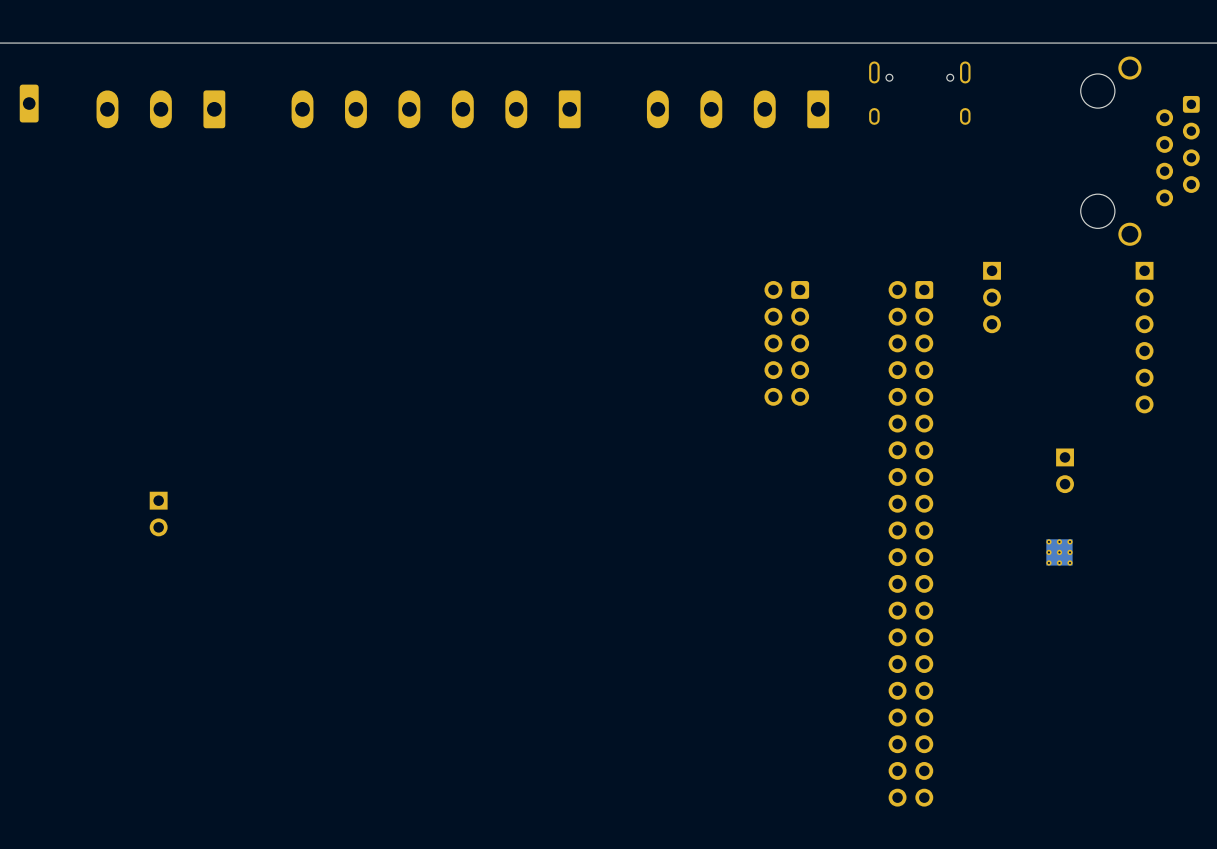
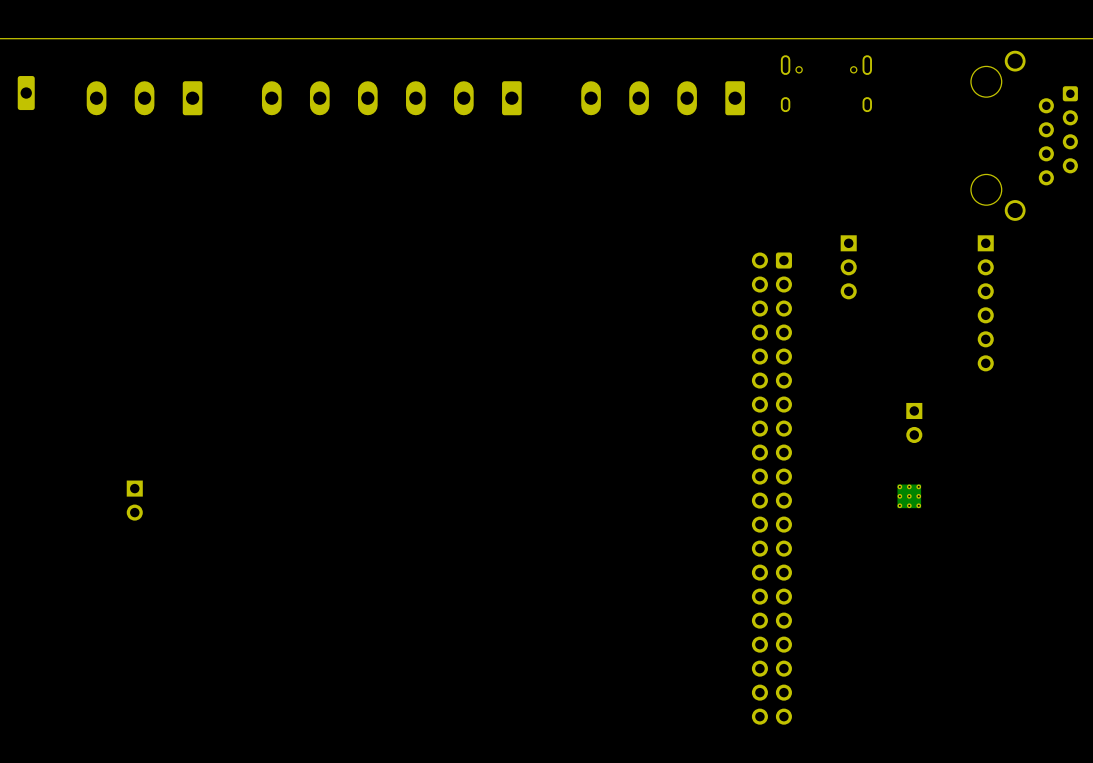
part position: (992, 297) -> (848, 267)
part position: (1144, 337) -> (985, 303)
part: (786, 343) -> none
part position: (1065, 470) -> (914, 422)
part position: (158, 514) -> (134, 500)
part position: (910, 543) -> (771, 488)
part position: (1059, 552) -> (909, 496)

